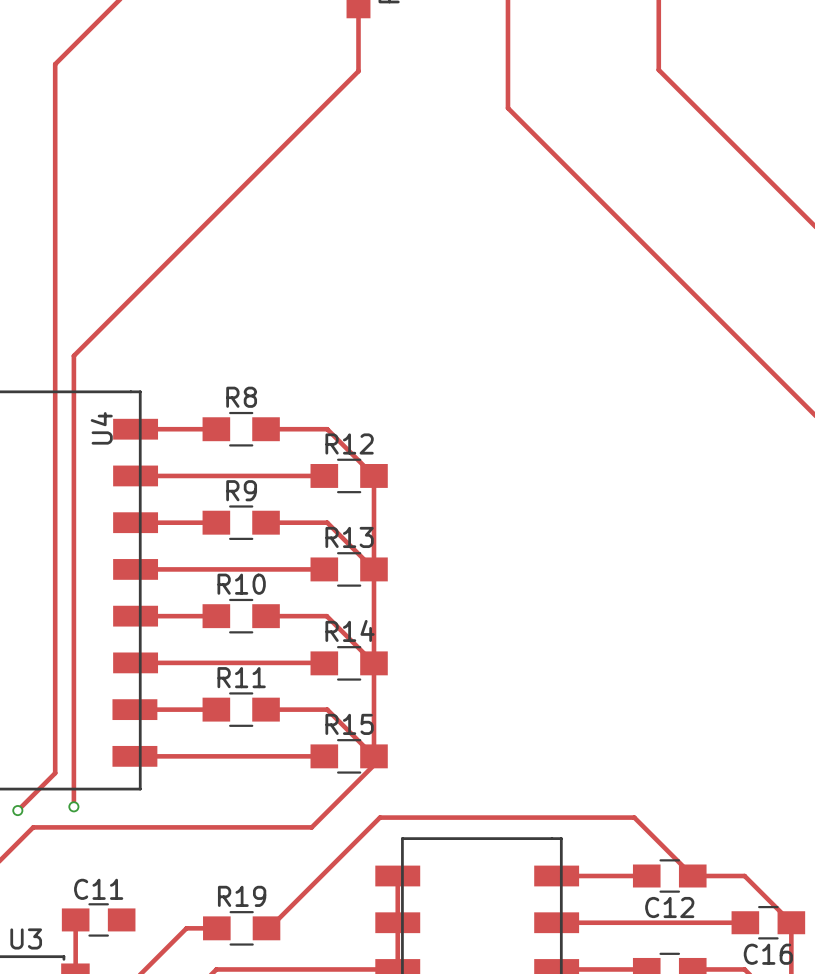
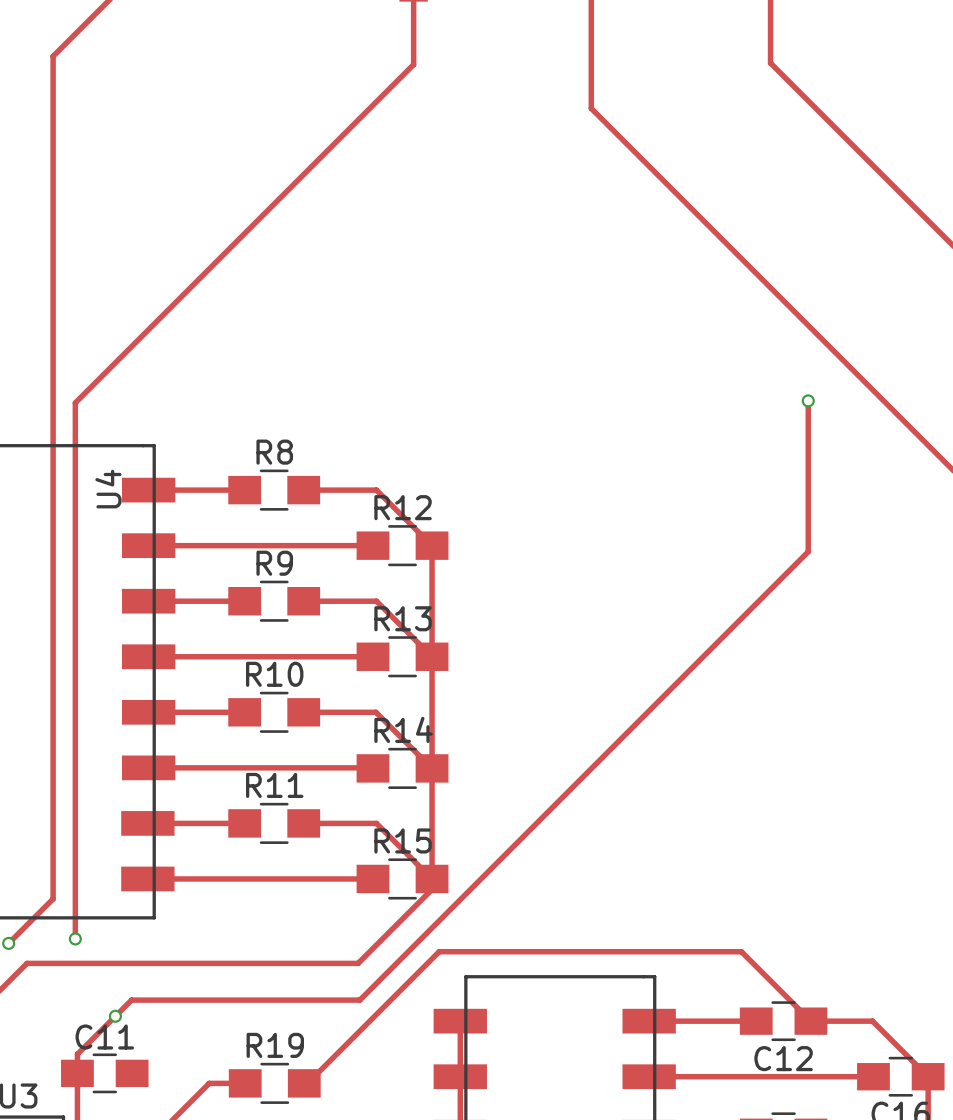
track: none -> (808, 400) (808, 551) (359, 1000) (131, 1000) (77, 1054) (77, 1073)
via: none -> (808, 400)
via: none -> (115, 1016)

